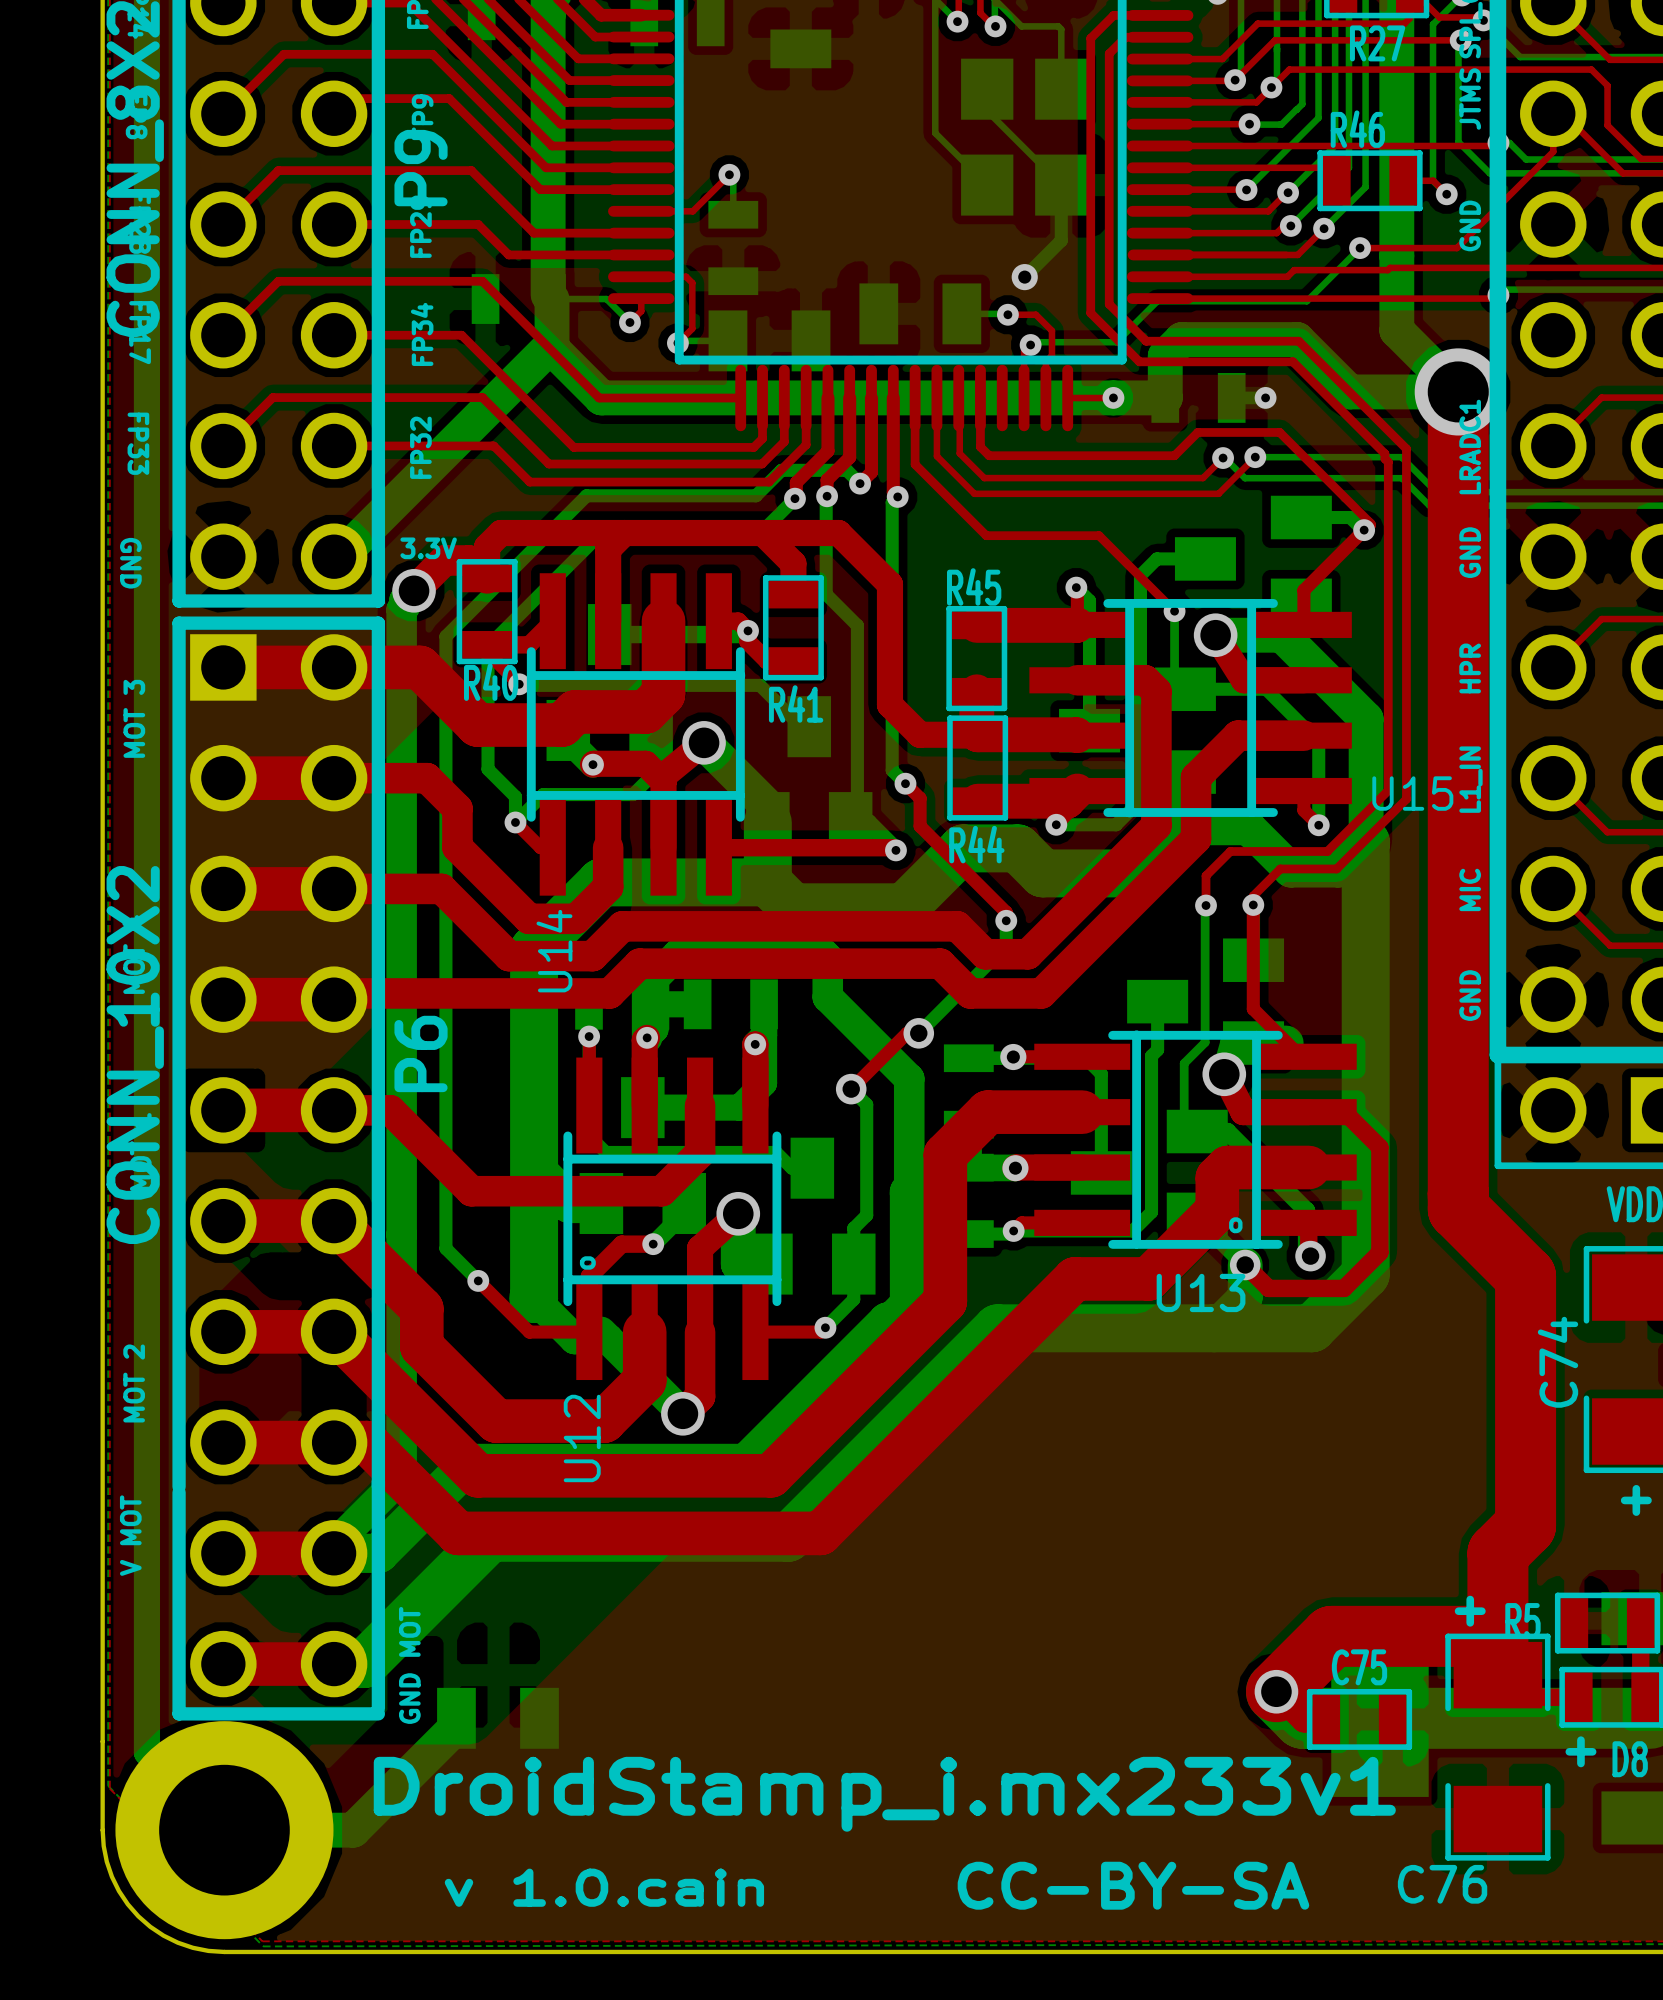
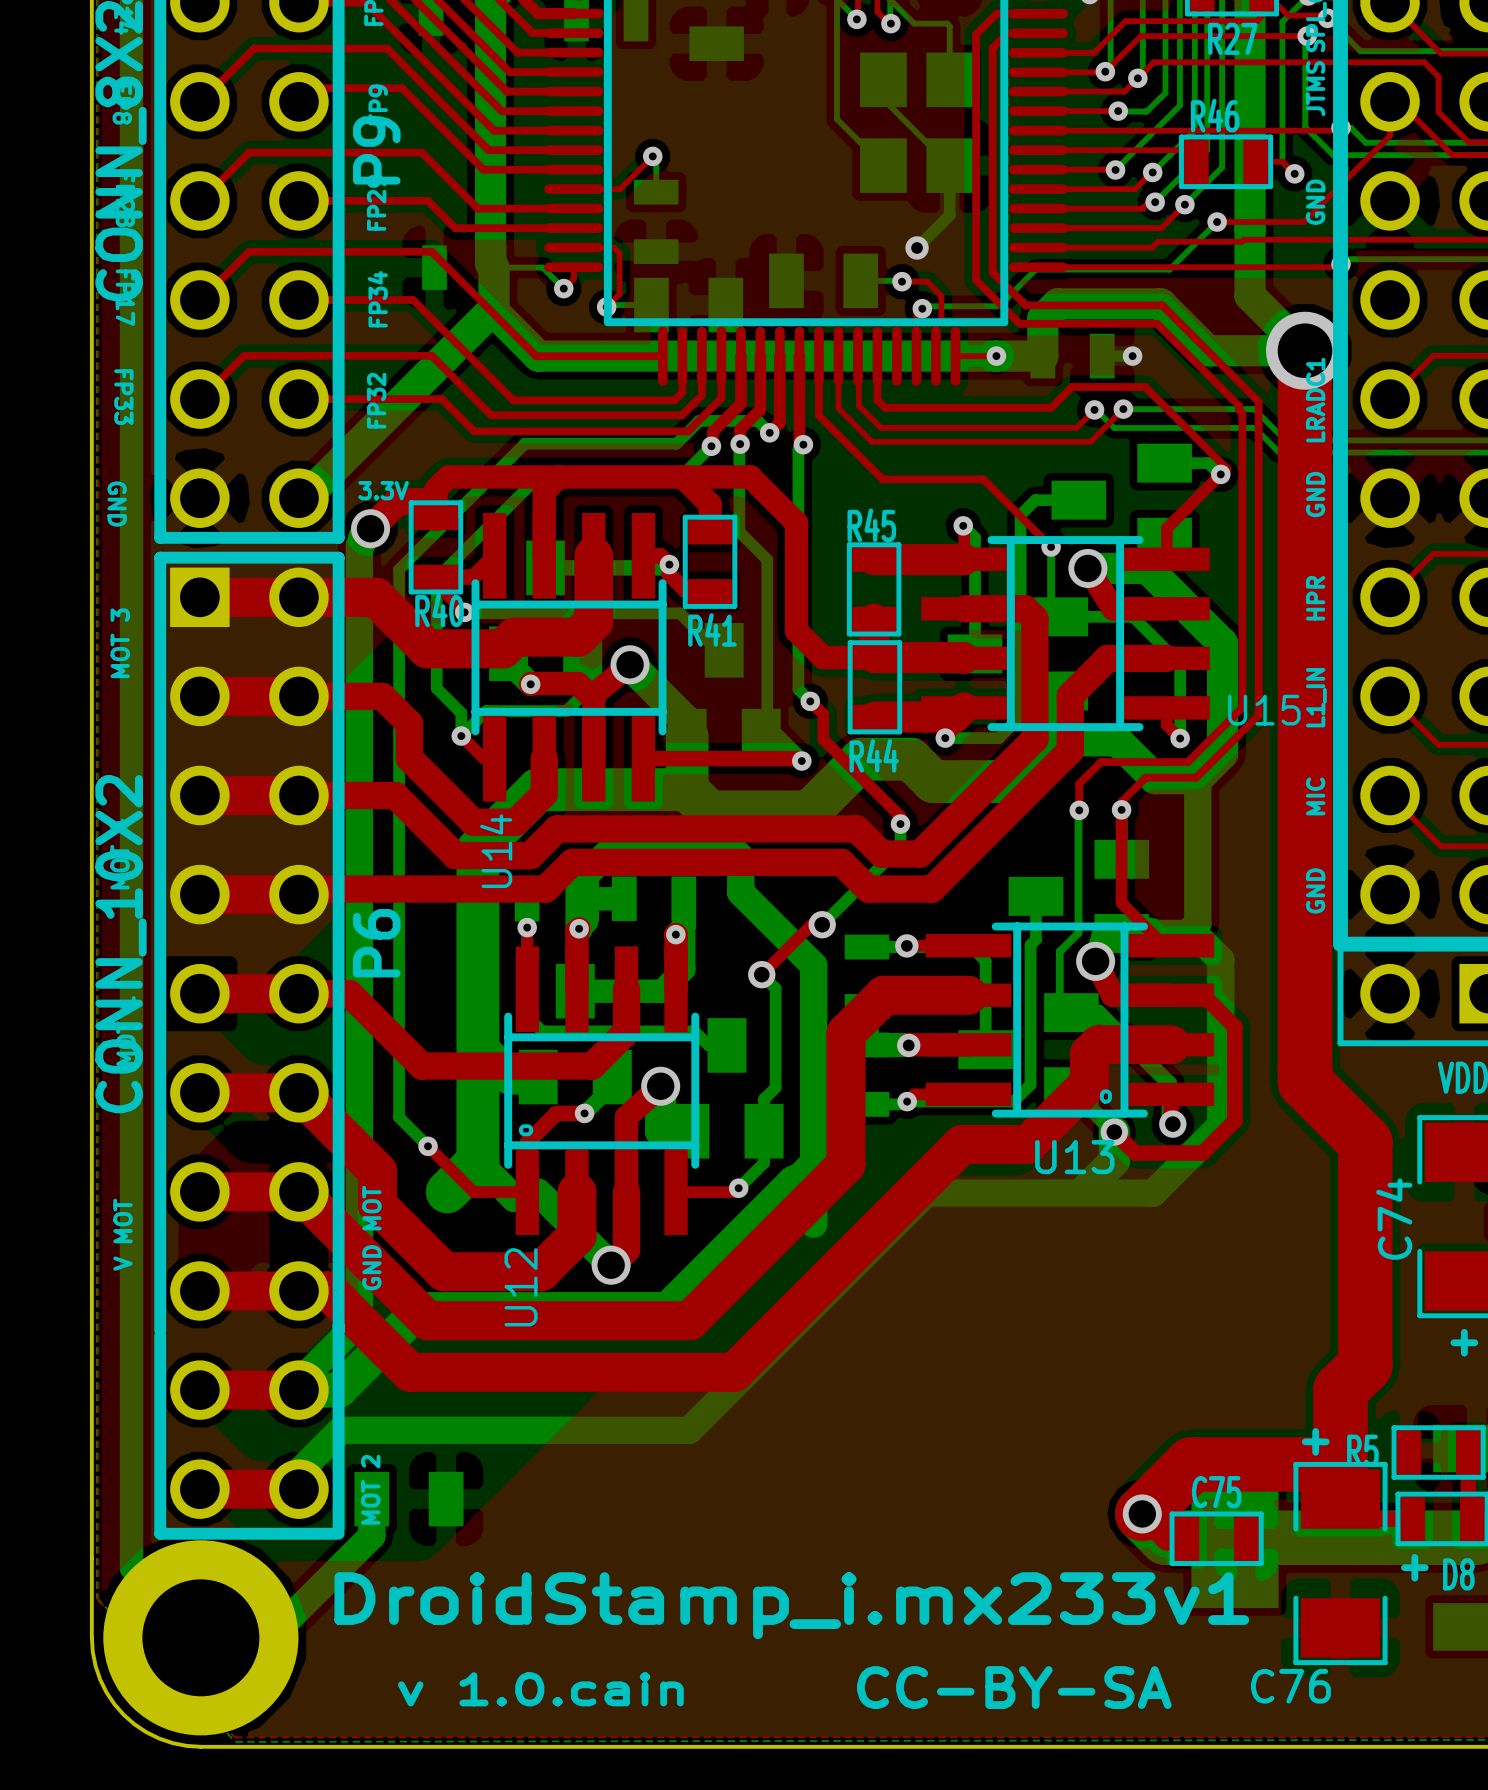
bottom track: (1365, 842) (1365, 1274) (1311, 1328) (997, 1328) (788, 1537) (490, 1537) (363, 1664) (334, 1664) -> (1191, 930) (1220, 959) (1220, 1125) (1153, 1193) (926, 1193) (689, 1430) (340, 1430) (298, 1471) (298, 1489)
bottom track: none -> (1197, 778) (1197, 923) (1187, 933) (1121, 933)
bottom track width: thick (909, 1192) (909, 1305) -> thin (813, 1067) (813, 1167)
bottom track: none -> (477, 1161) (447, 1191)
text position: MOT 2 (134, 1383) -> MOT 2 (370, 1489)
text position: V MOT (130, 1535) -> V MOT (122, 1234)
text position: GND MOT (409, 1665) -> GND MOT (371, 1238)
bottom track: (456, 1718) (456, 1726) (353, 1830) (301, 1830) -> (371, 1499) (371, 1535) (269, 1637)
part position: (497, 1718) -> (408, 1499)

